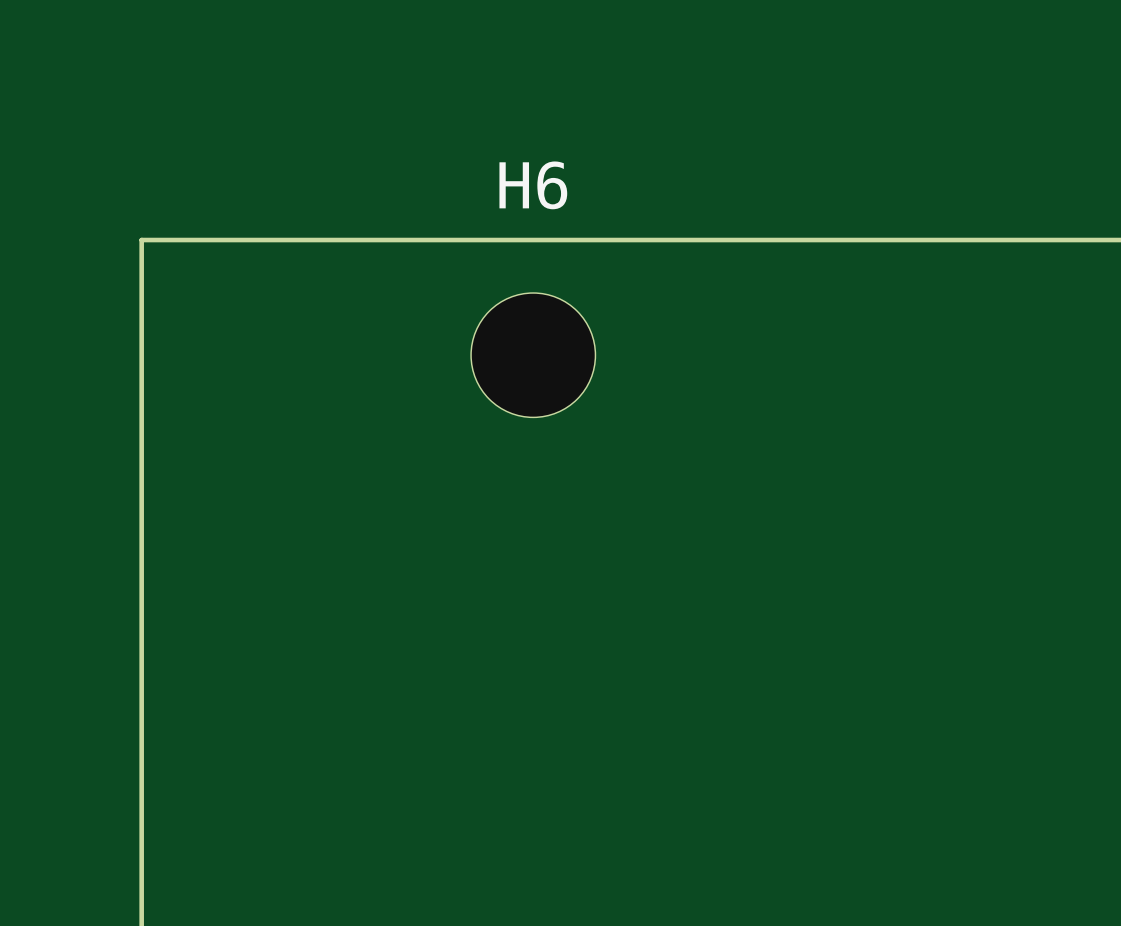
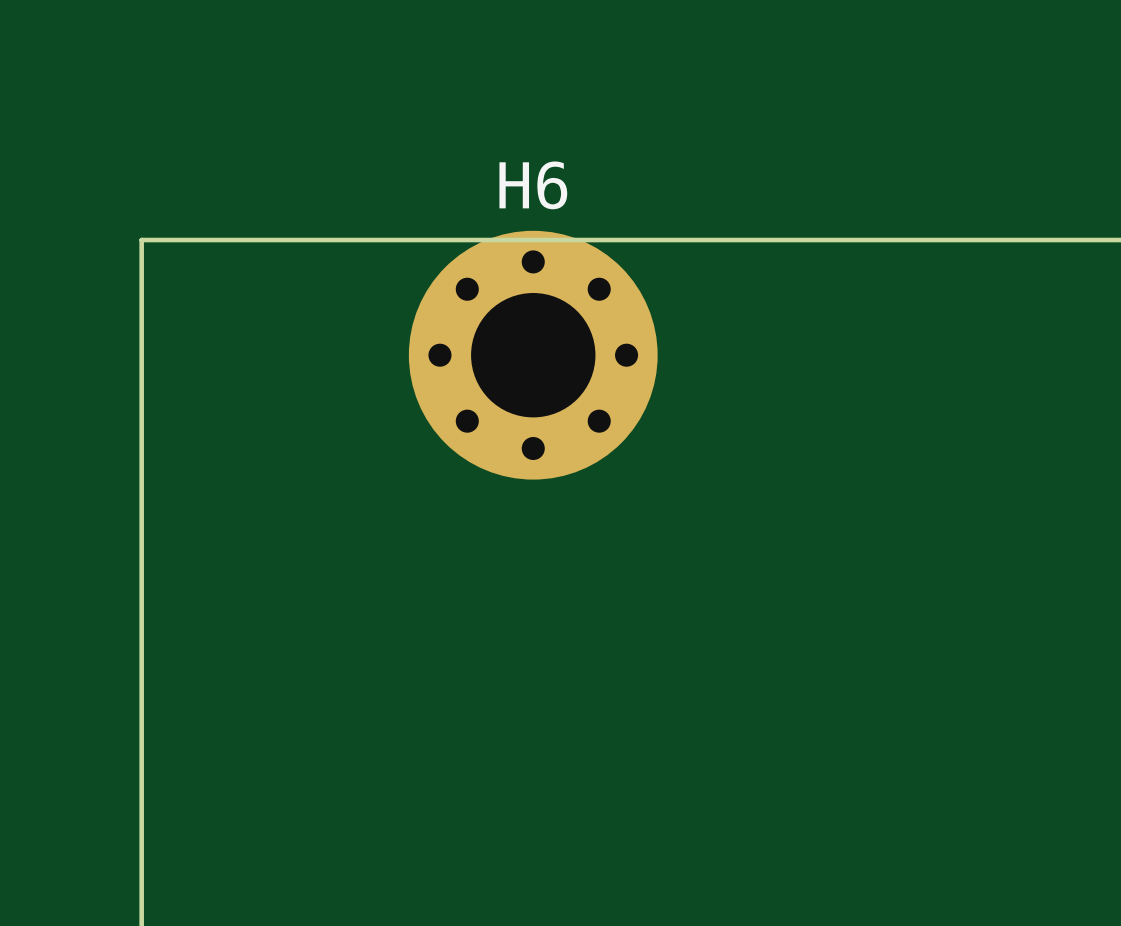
H6 footprint: [471, 293, 596, 418] -> [408, 230, 658, 480]

